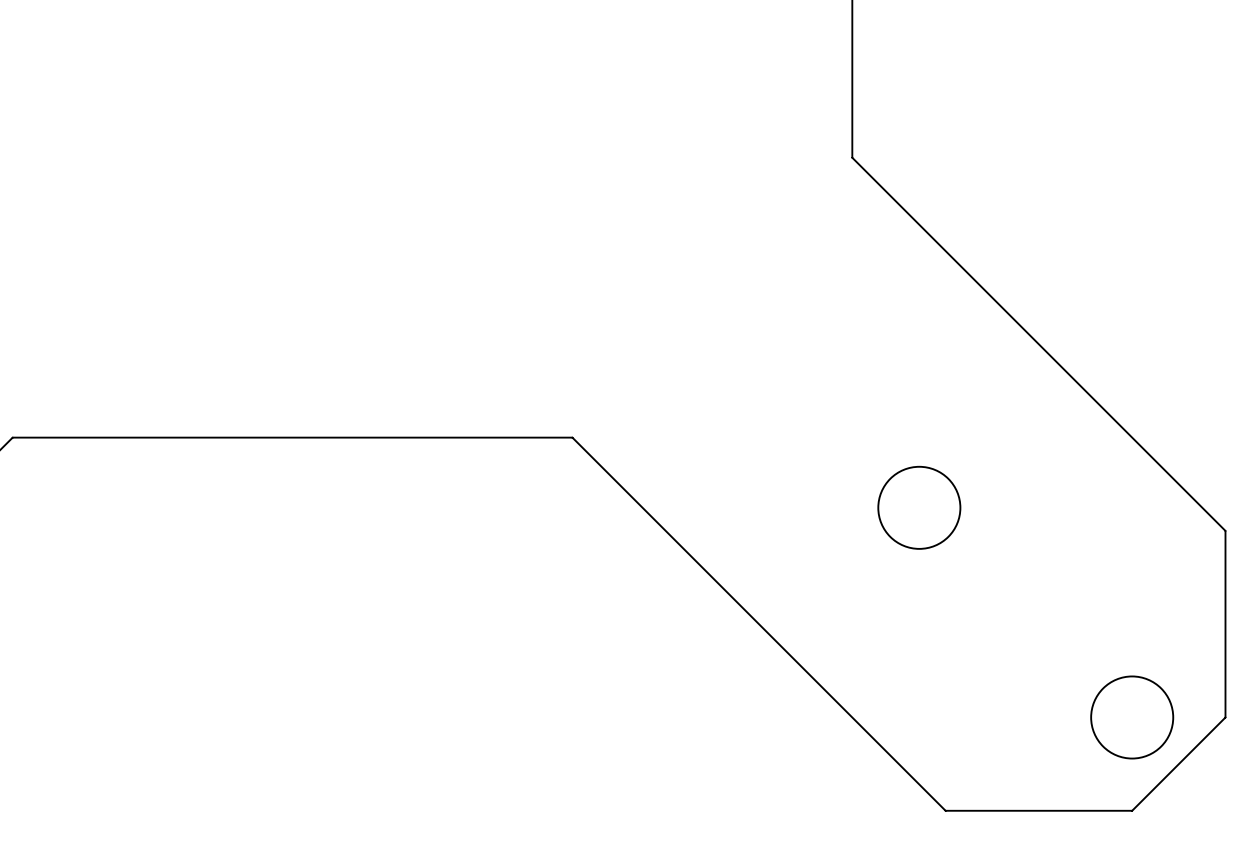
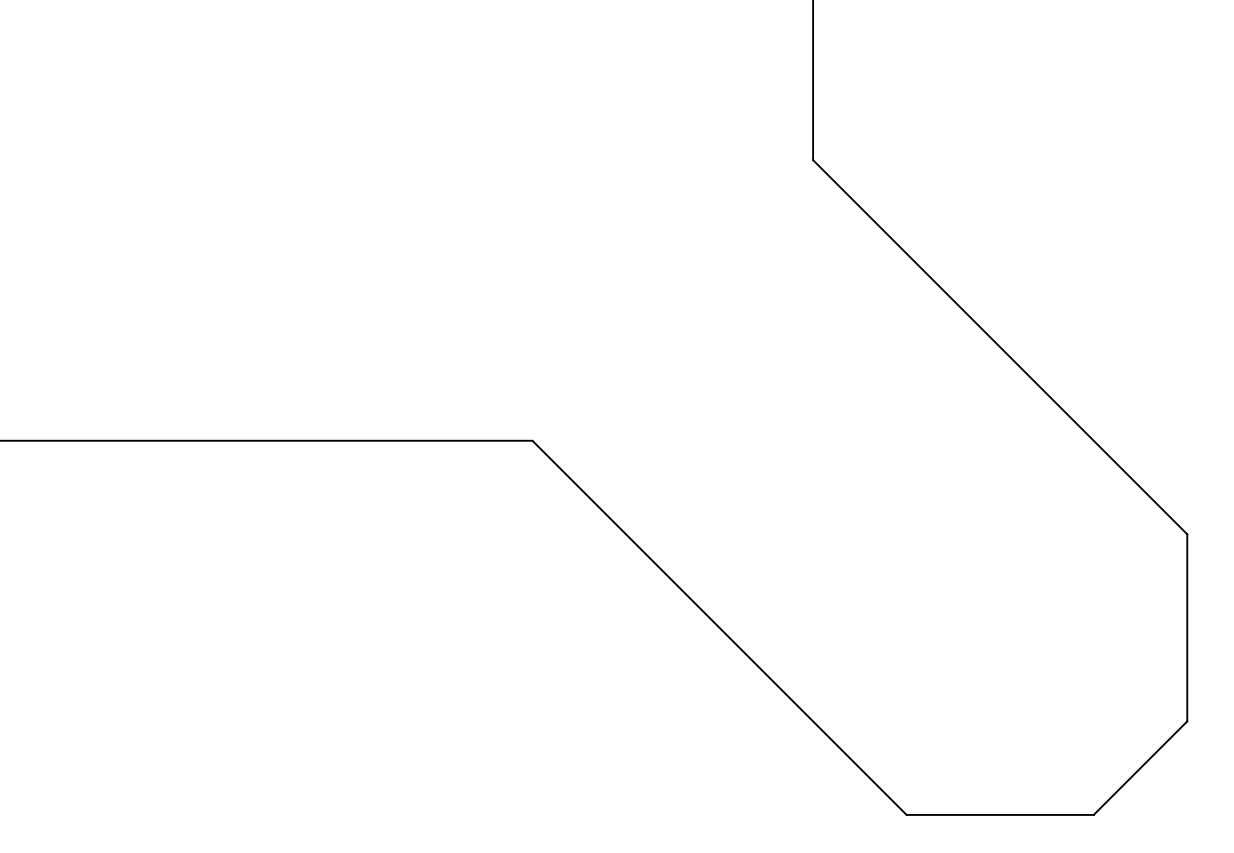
round board edge: [877, 465, 962, 550] -> none
round board edge: [1090, 675, 1175, 760] -> none

